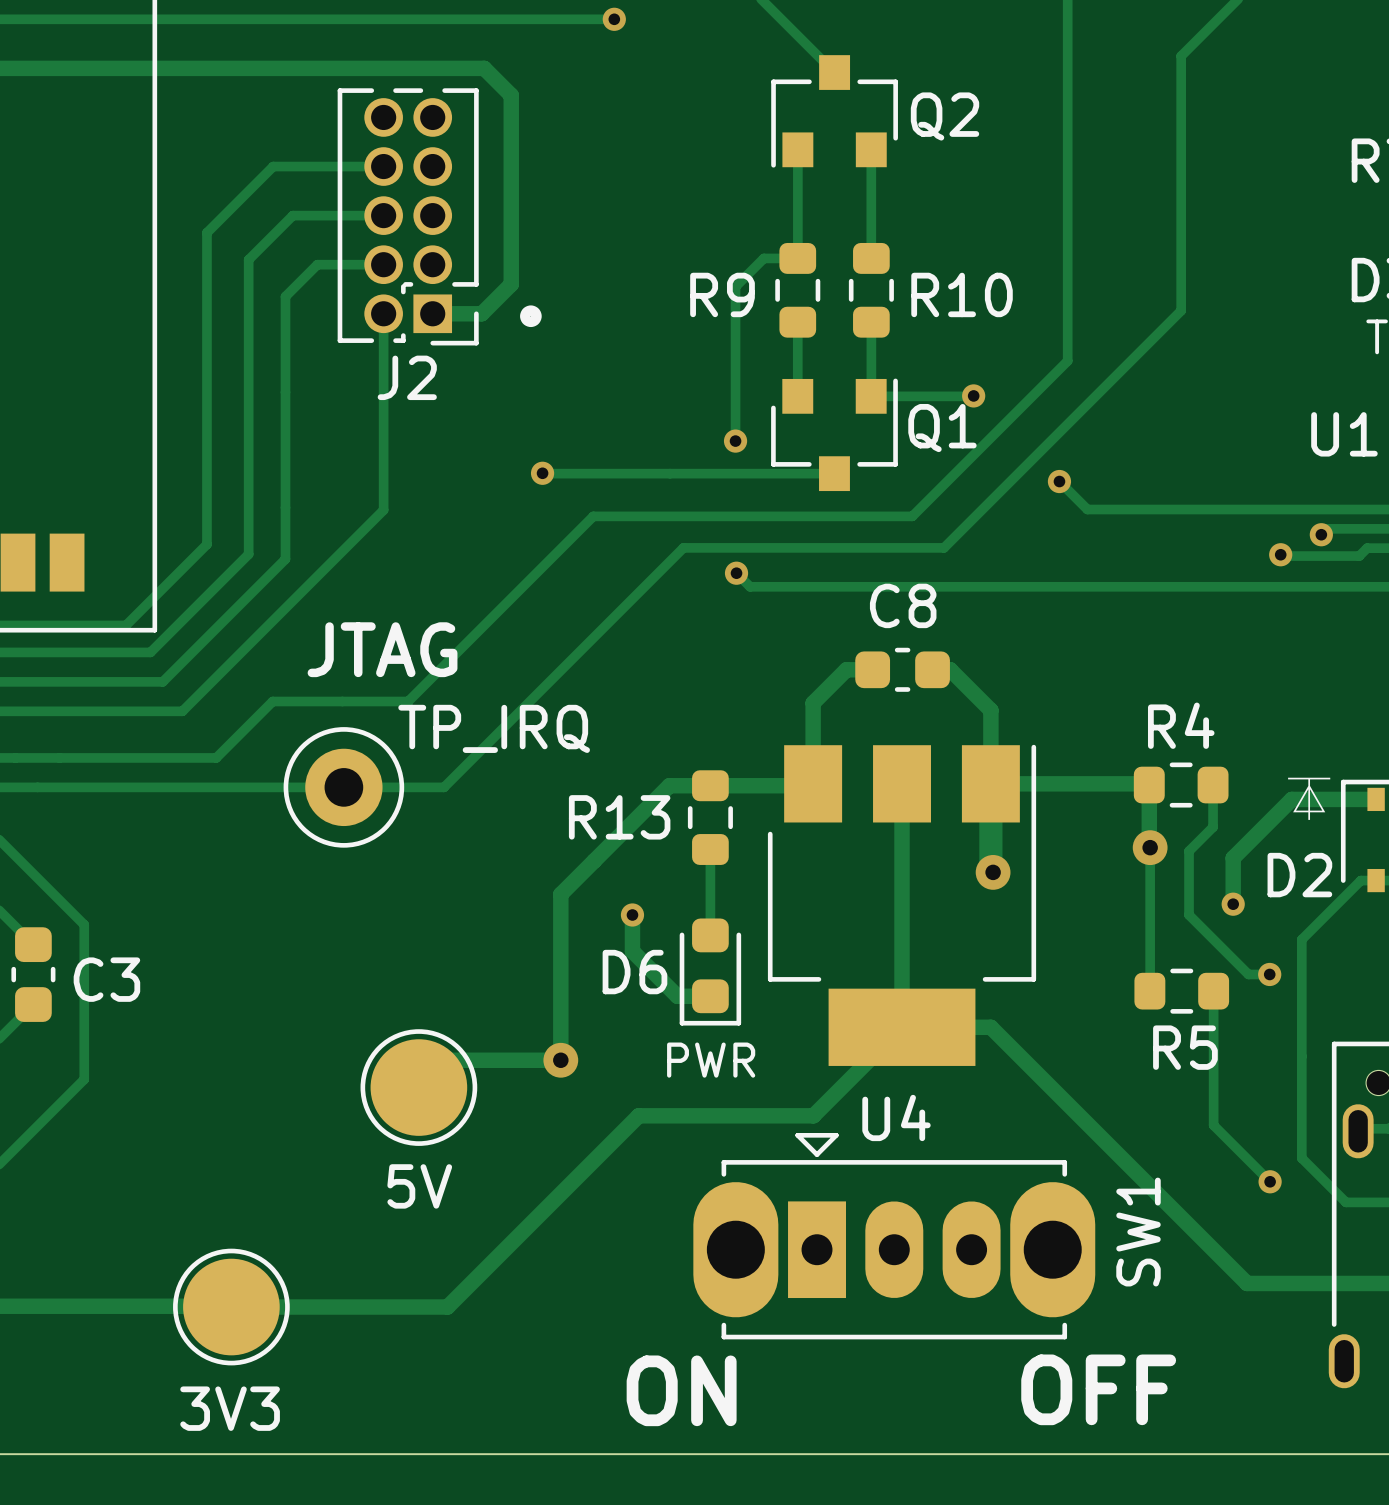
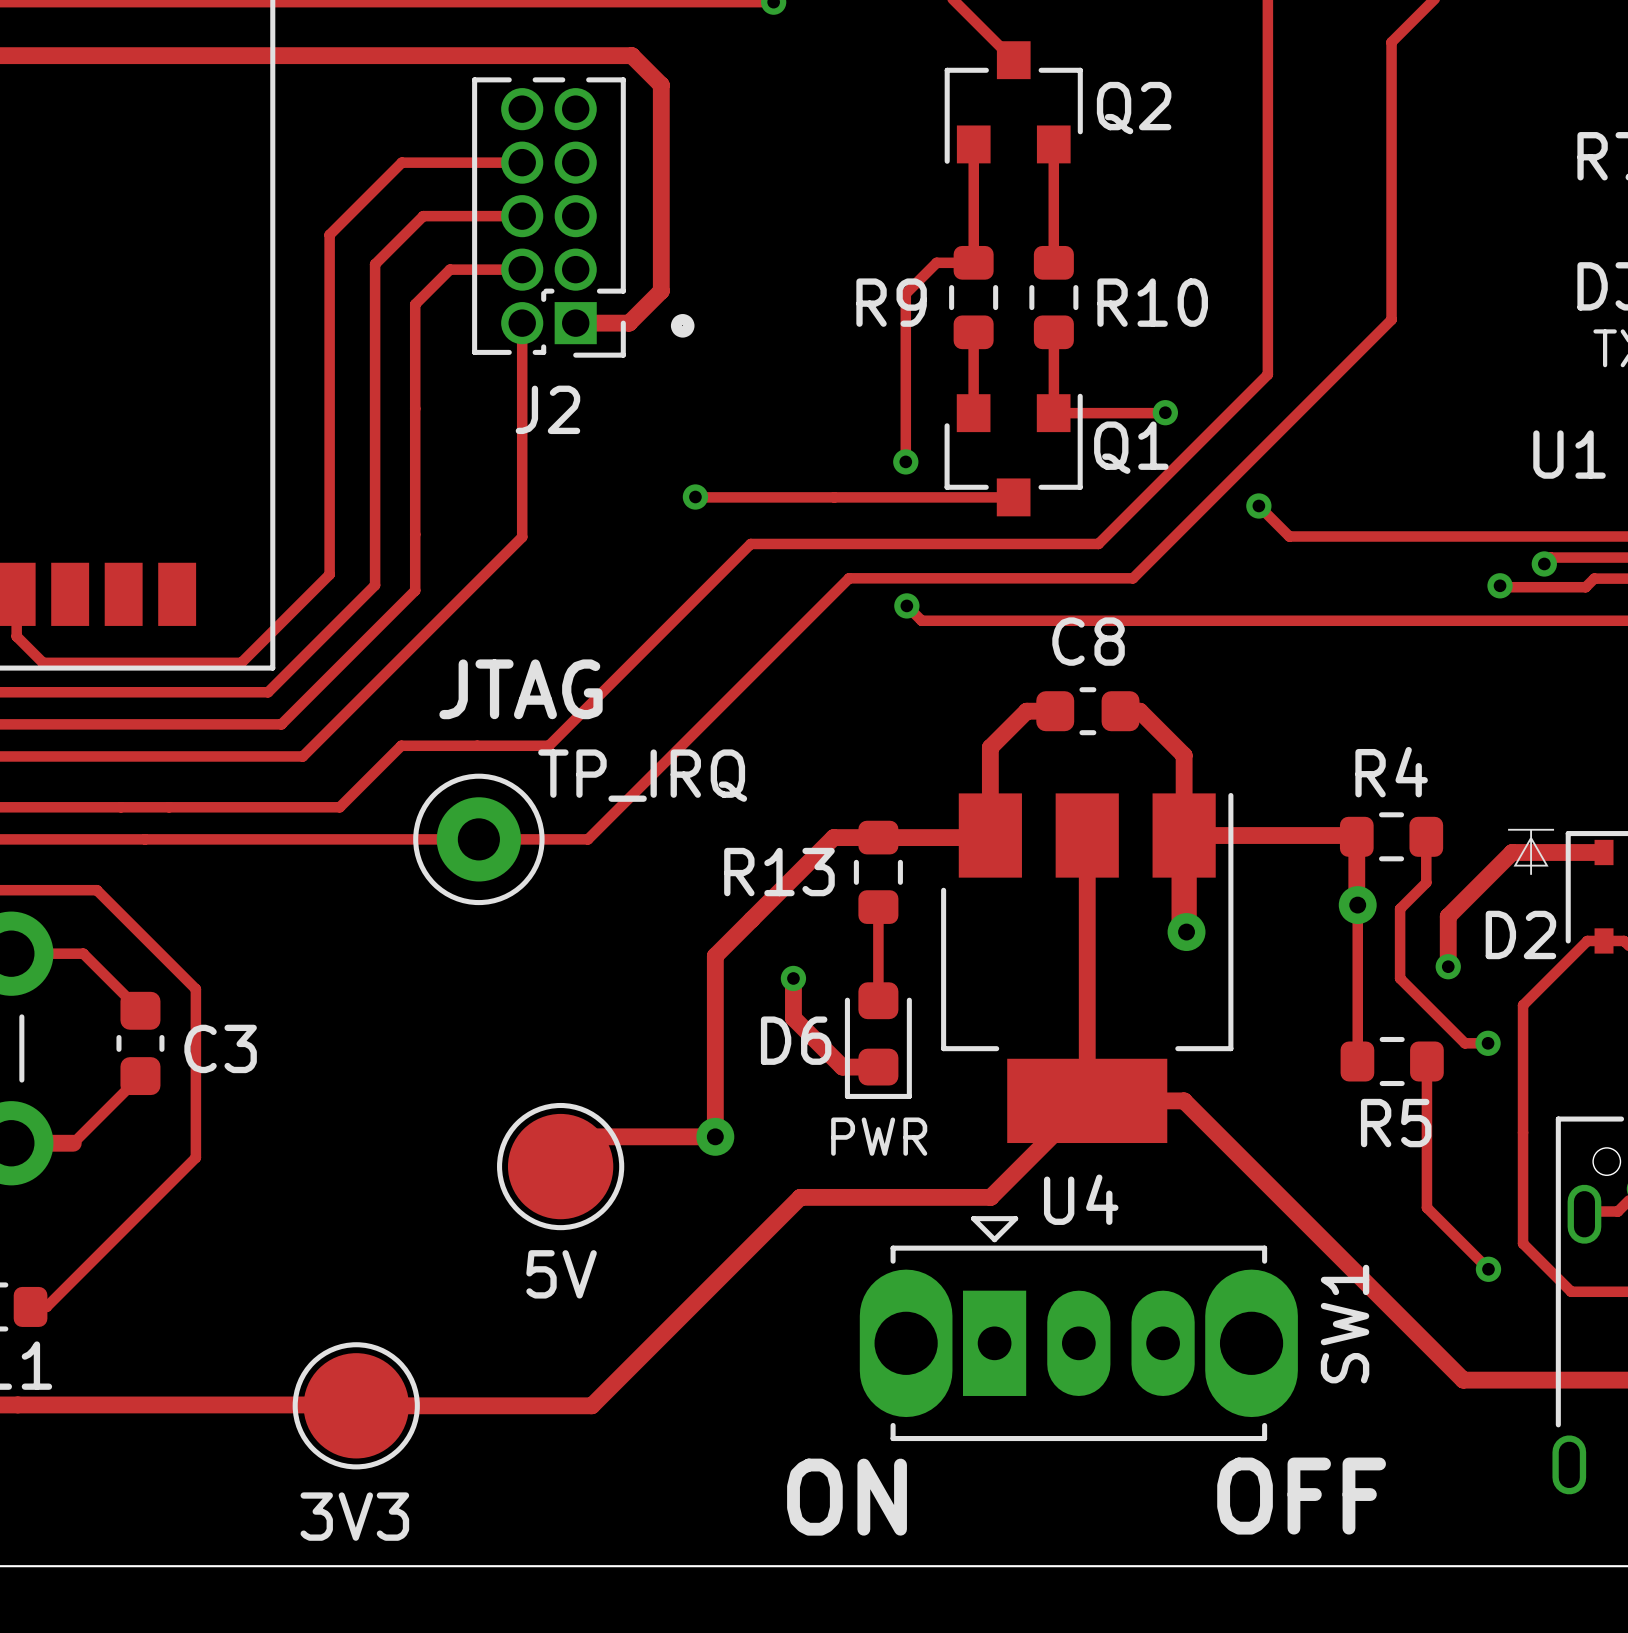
J2 name position: J2 (407, 377) -> J2 (547, 409)

